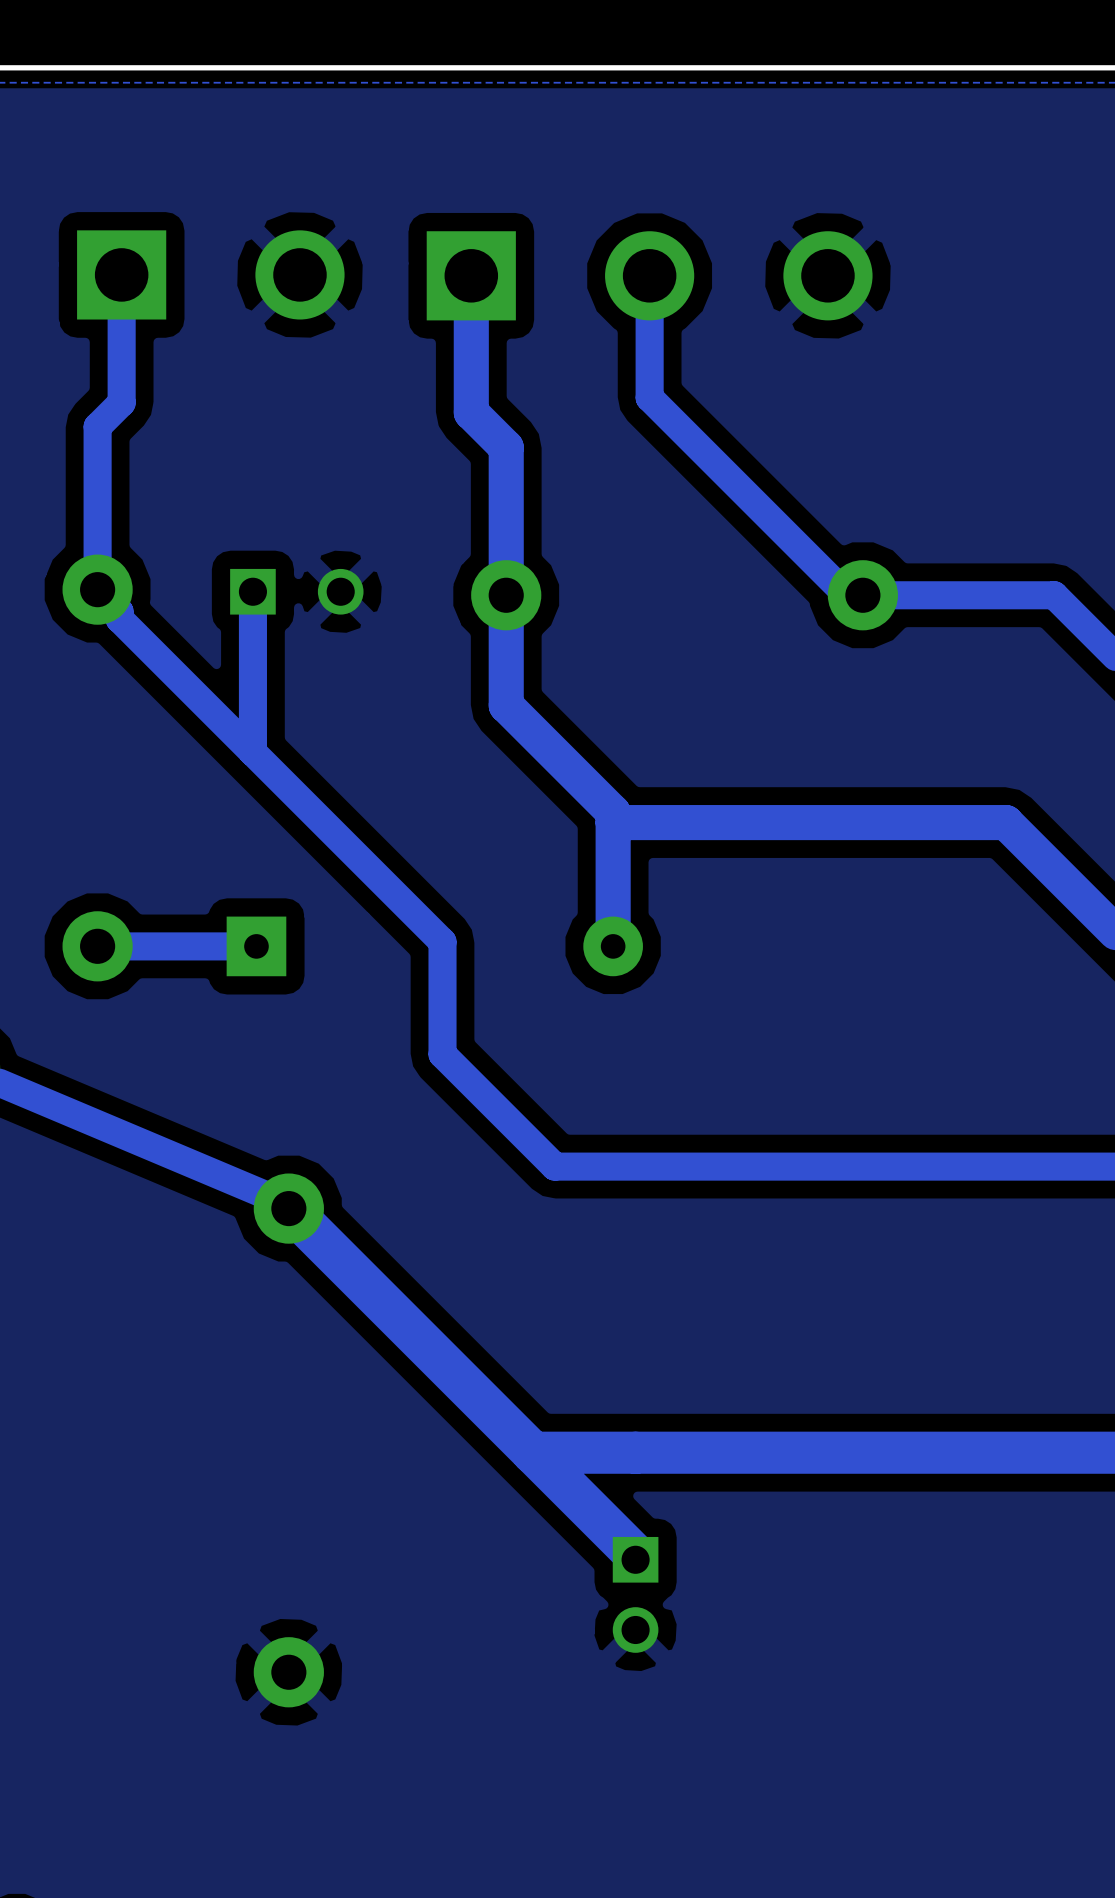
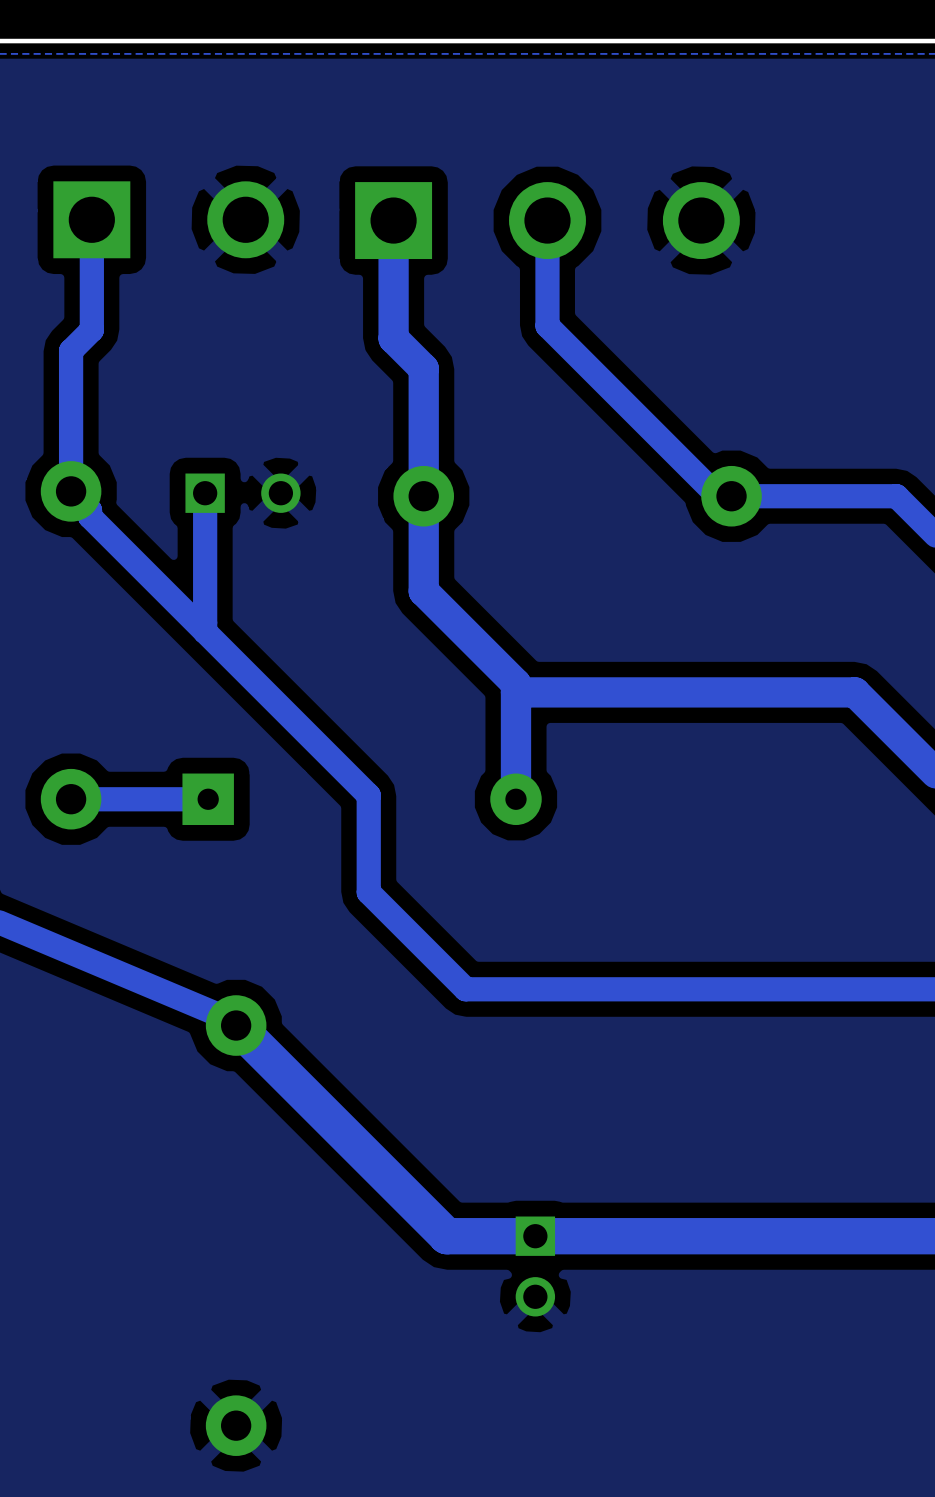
bottom track: (532, 1452) (635, 1555) (635, 1559) -> none
part position: (635, 1594) -> (535, 1266)

